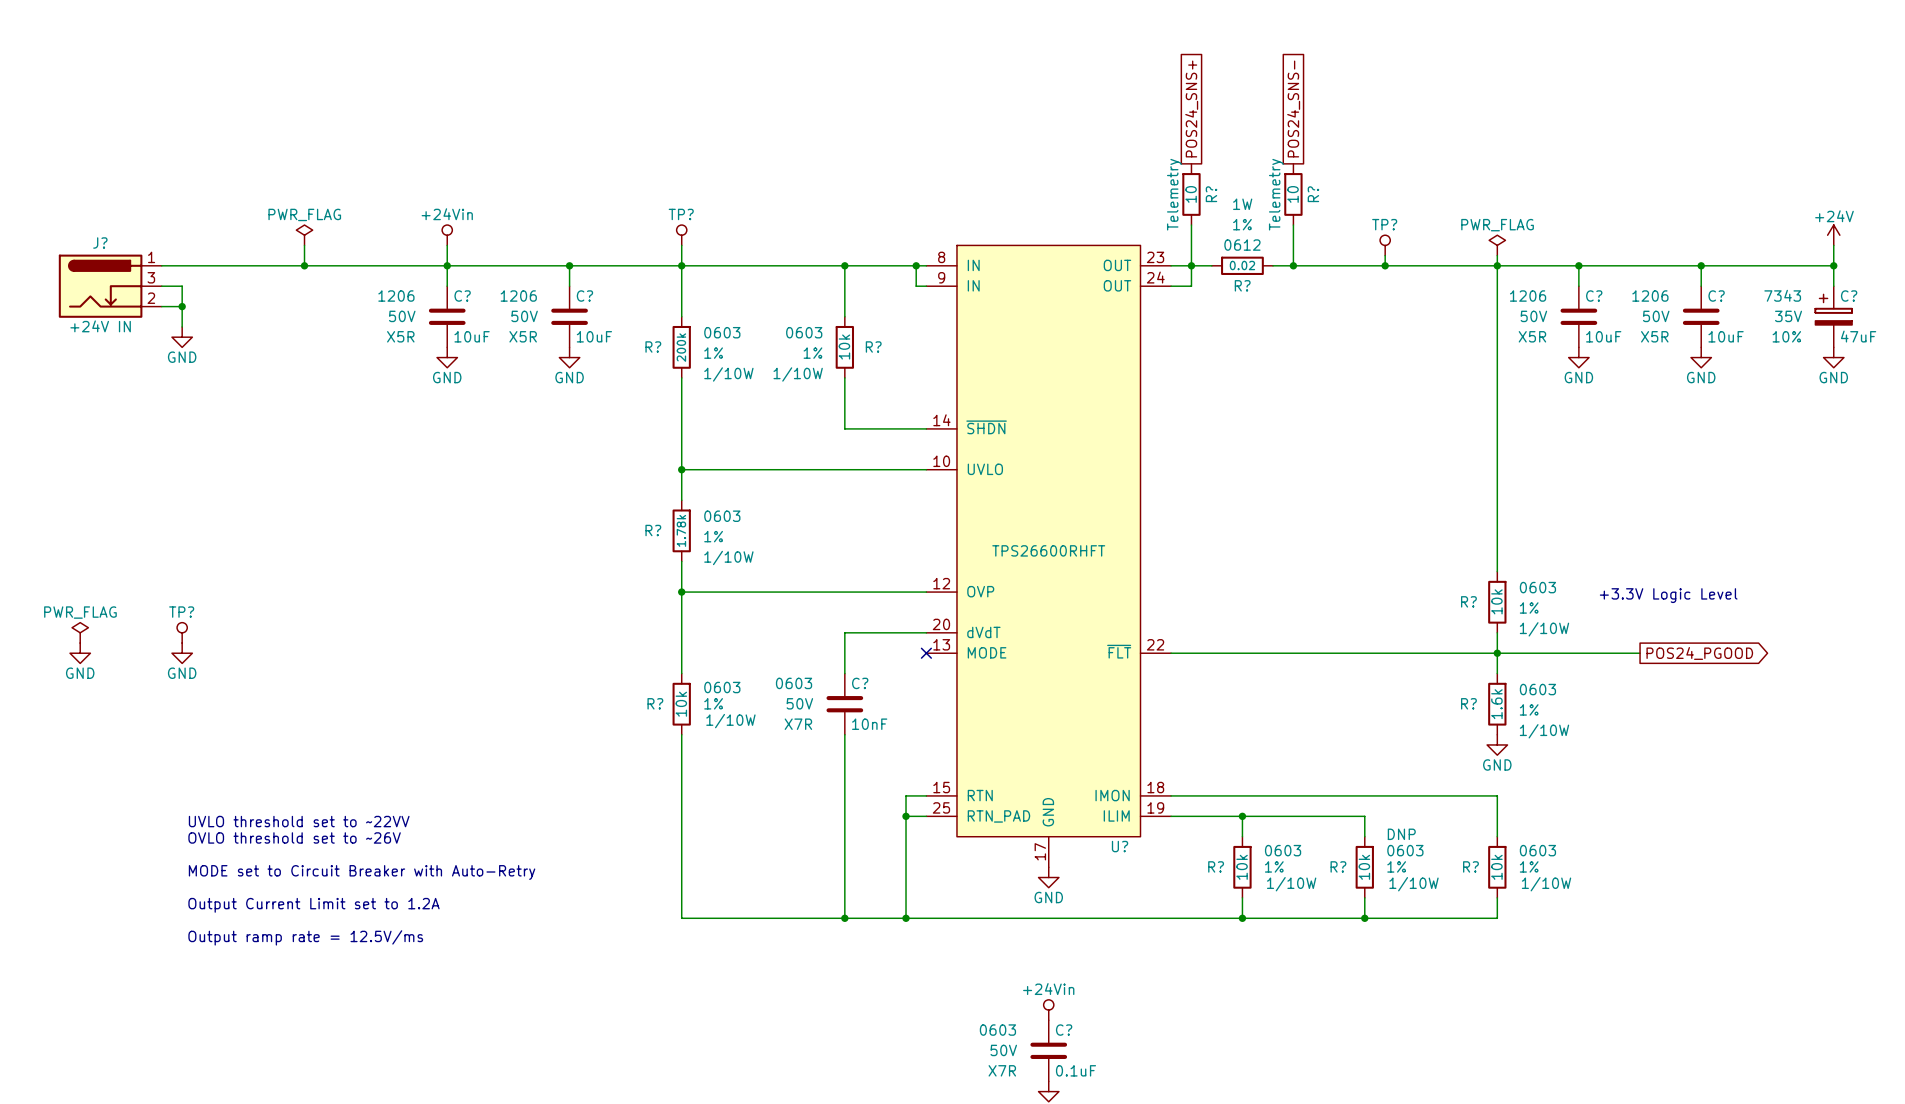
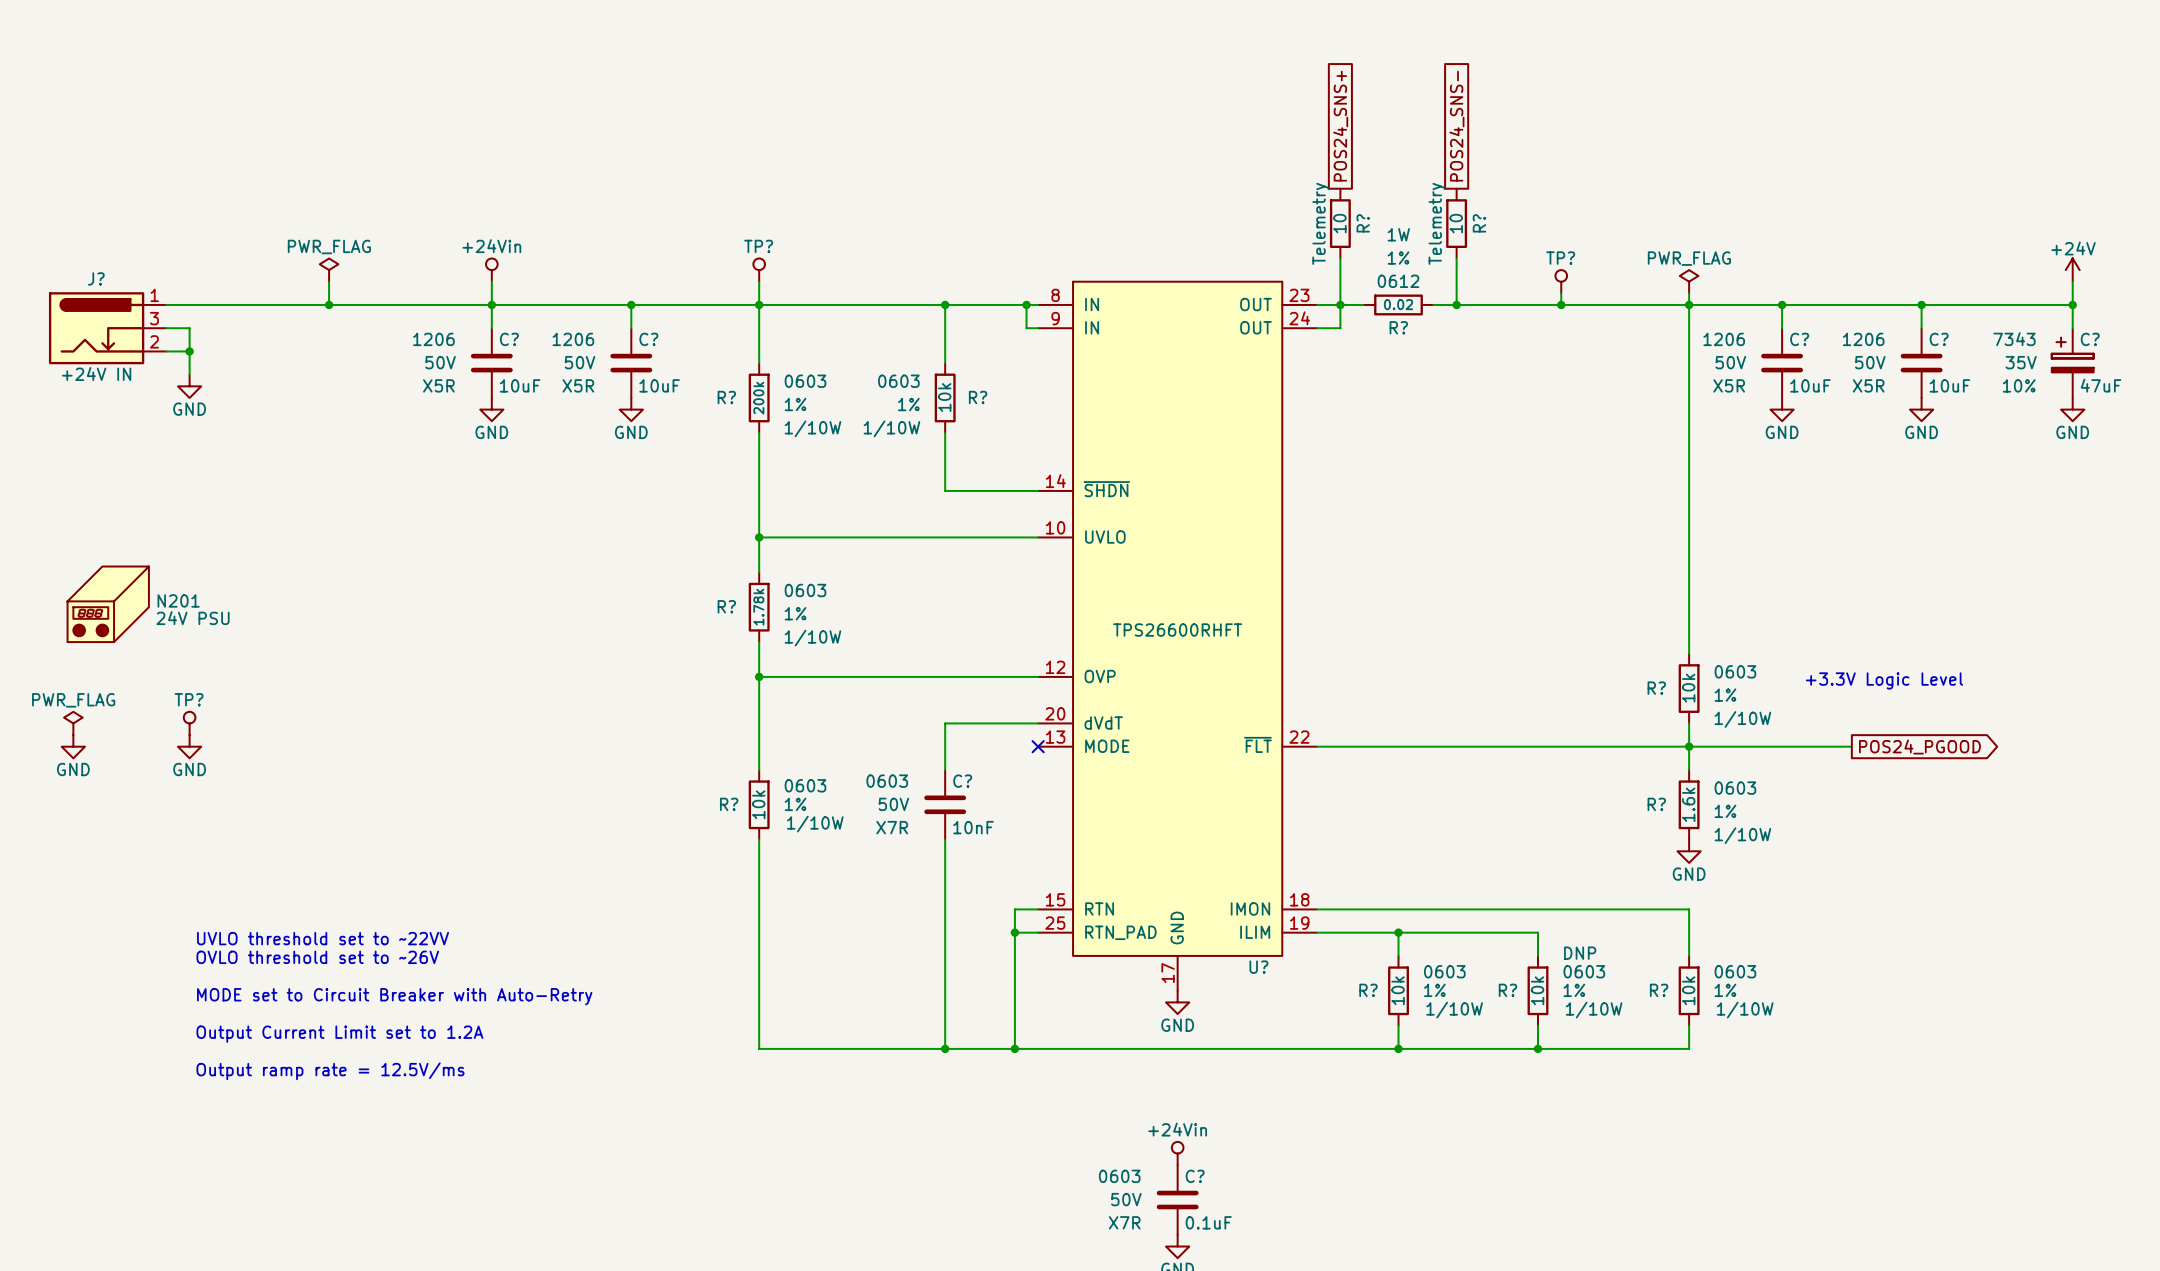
N201: none -> 24V PSU (108, 604)

